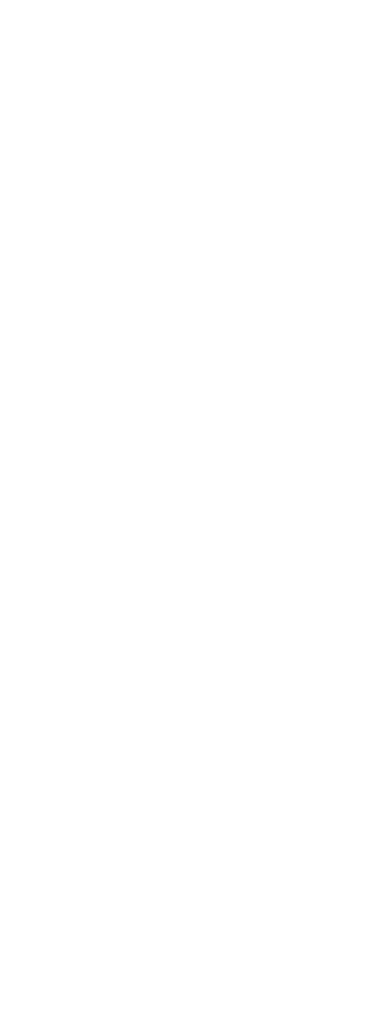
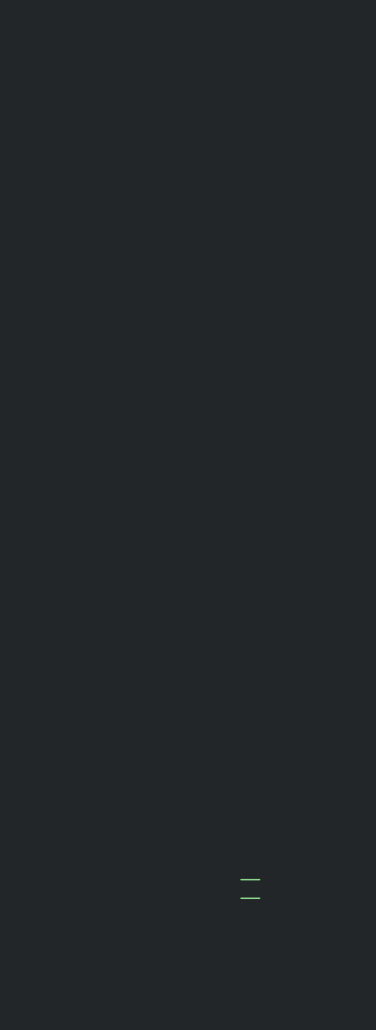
wire: none -> (241, 879) (259, 879)
wire: none -> (241, 898) (259, 898)

